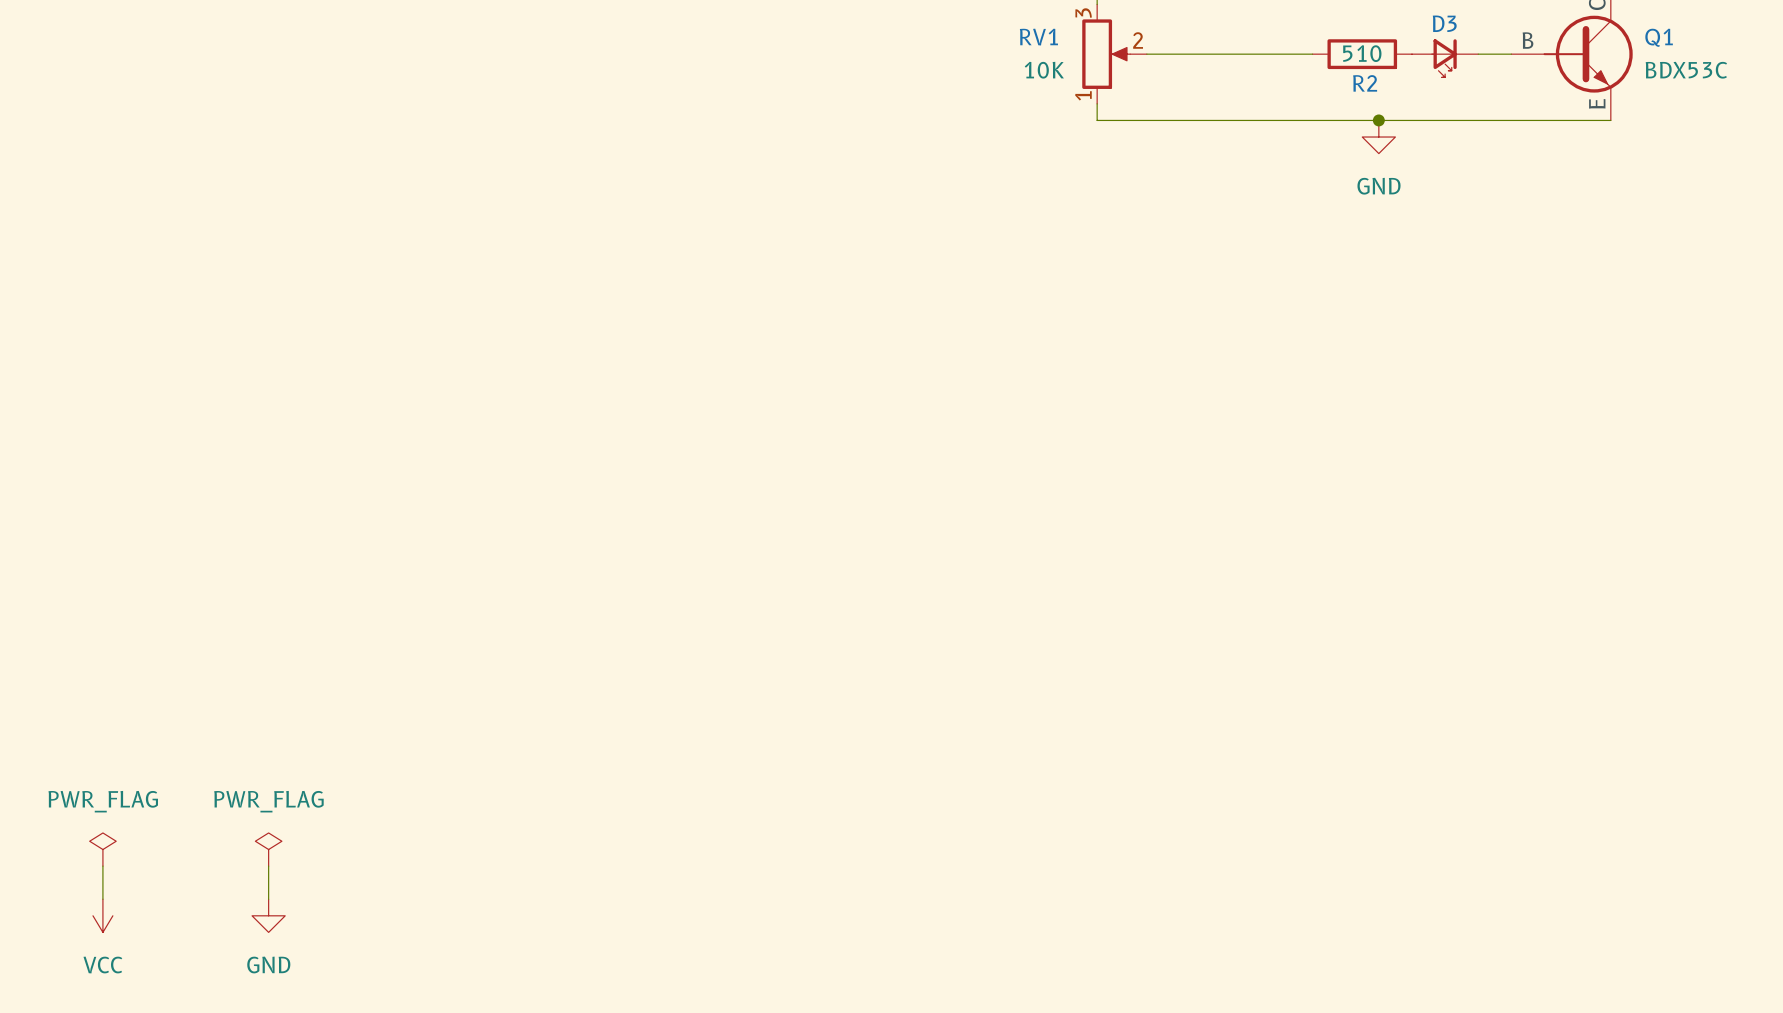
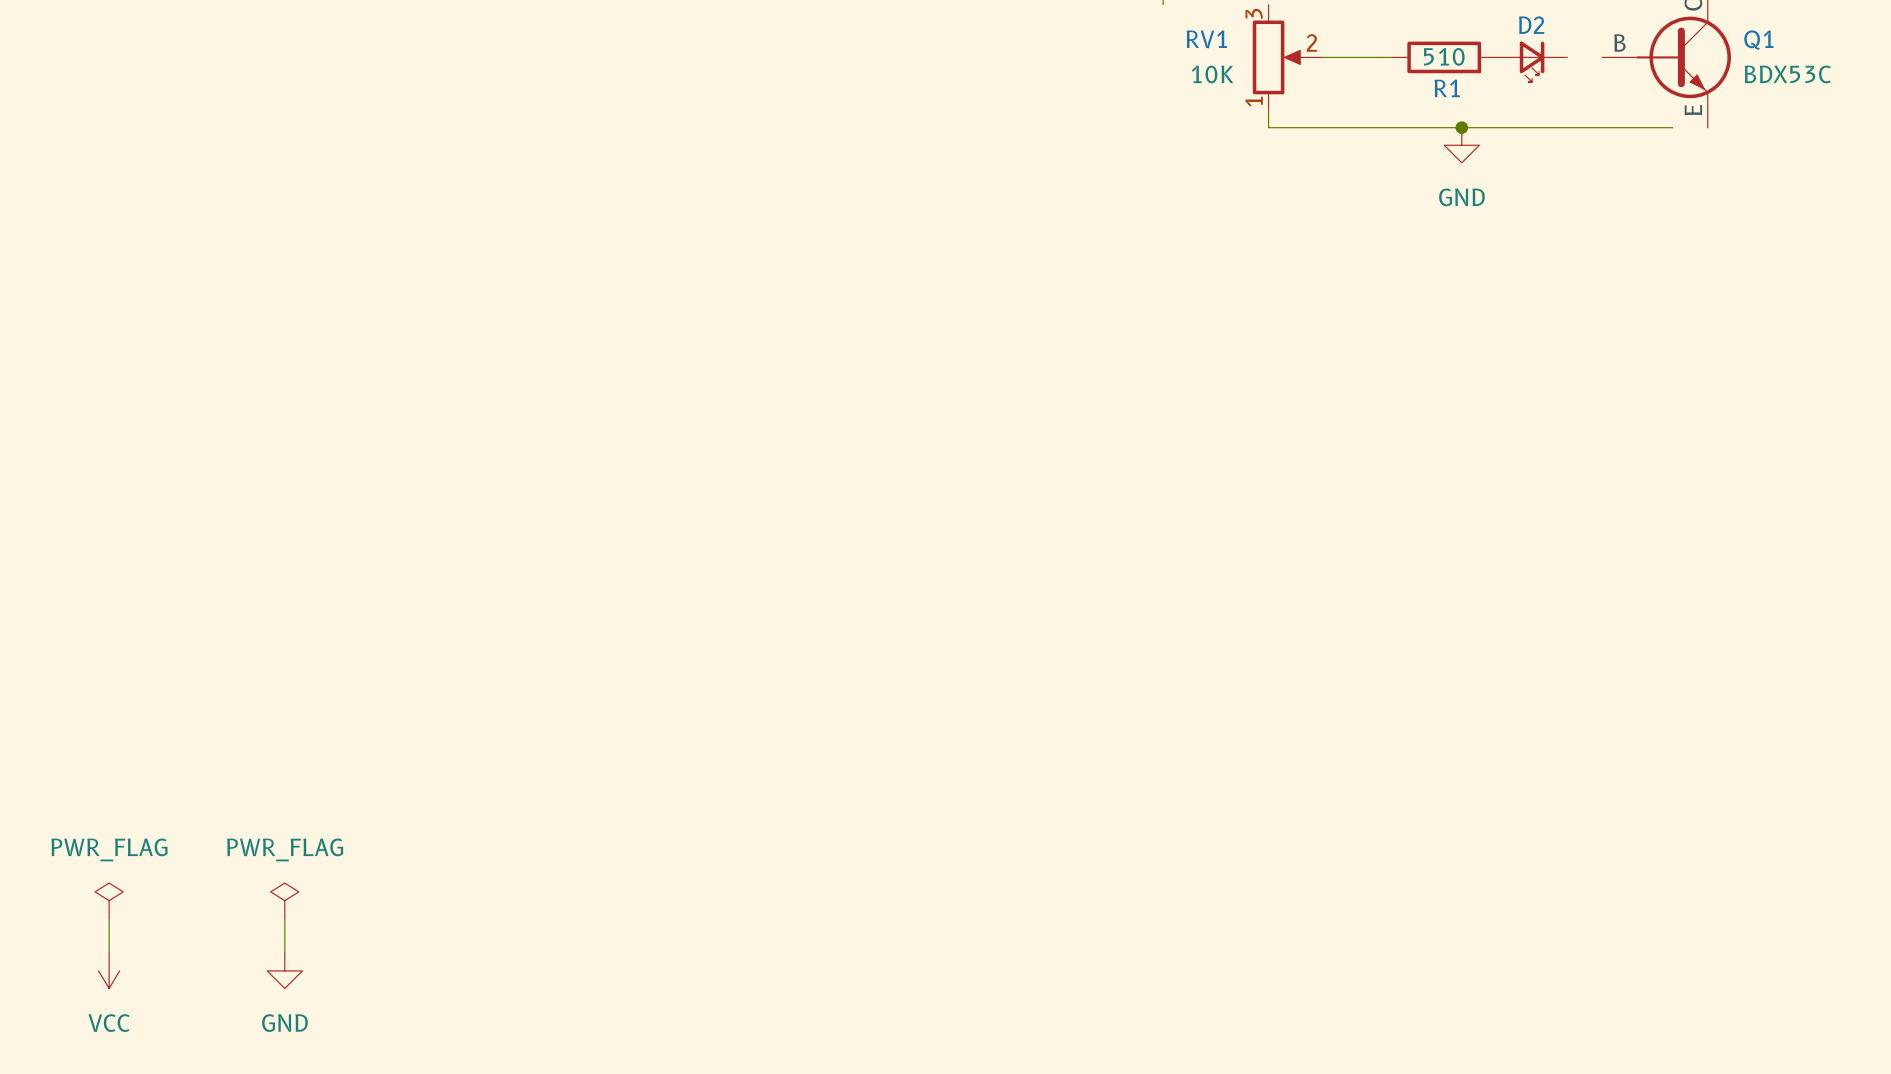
D3 name: D3 (1444, 23) -> D2 (1531, 25)
RV1 position: (1114, 54) -> (1287, 57)
wire: (1146, 54) (1246, 54) -> none
wire: (1478, 54) (1511, 54) -> none
R2 name: R2 (1365, 83) -> R1 (1447, 88)
wire: (1097, 103) (1097, 120) (1196, 120) -> (1268, 110) (1268, 127)
wire: (1577, 120) (1610, 120) -> none

